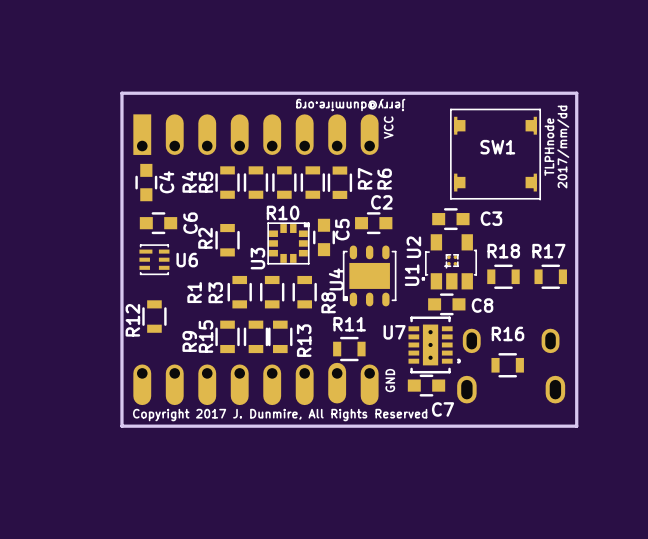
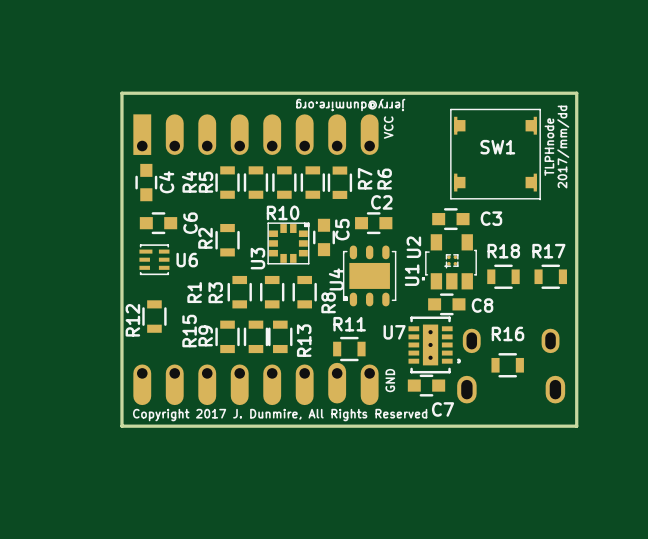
R15 name: R15 (205, 336) -> R9 (205, 335)
R9 name: R9 (189, 341) -> R15 (189, 331)

